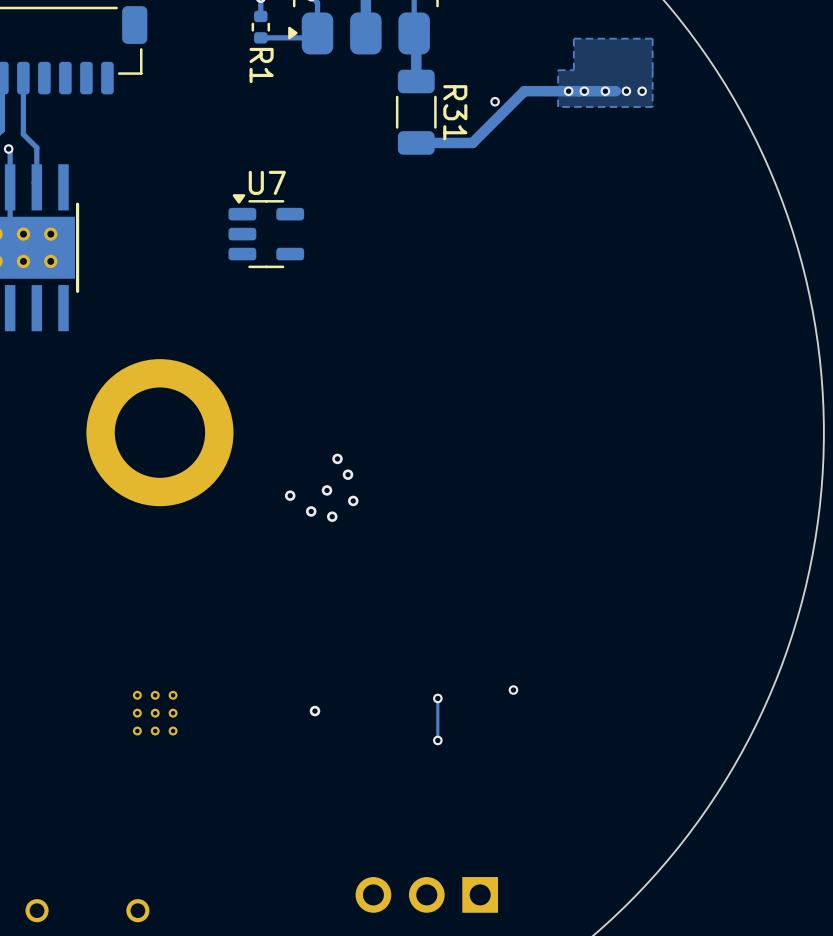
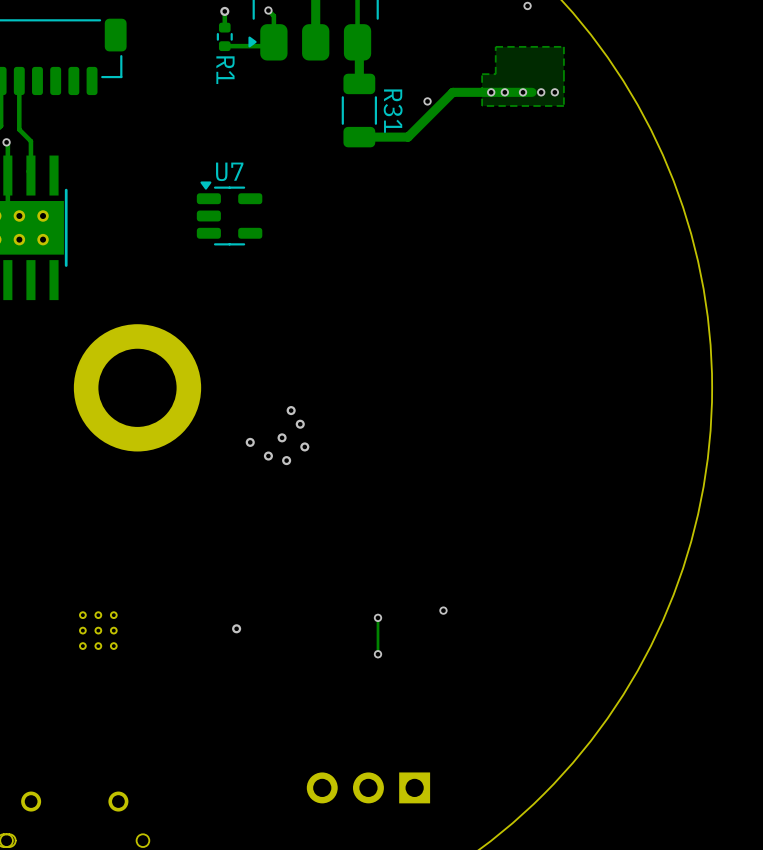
via position: (314, 711) -> (236, 628)
part position: (155, 713) -> (98, 630)

